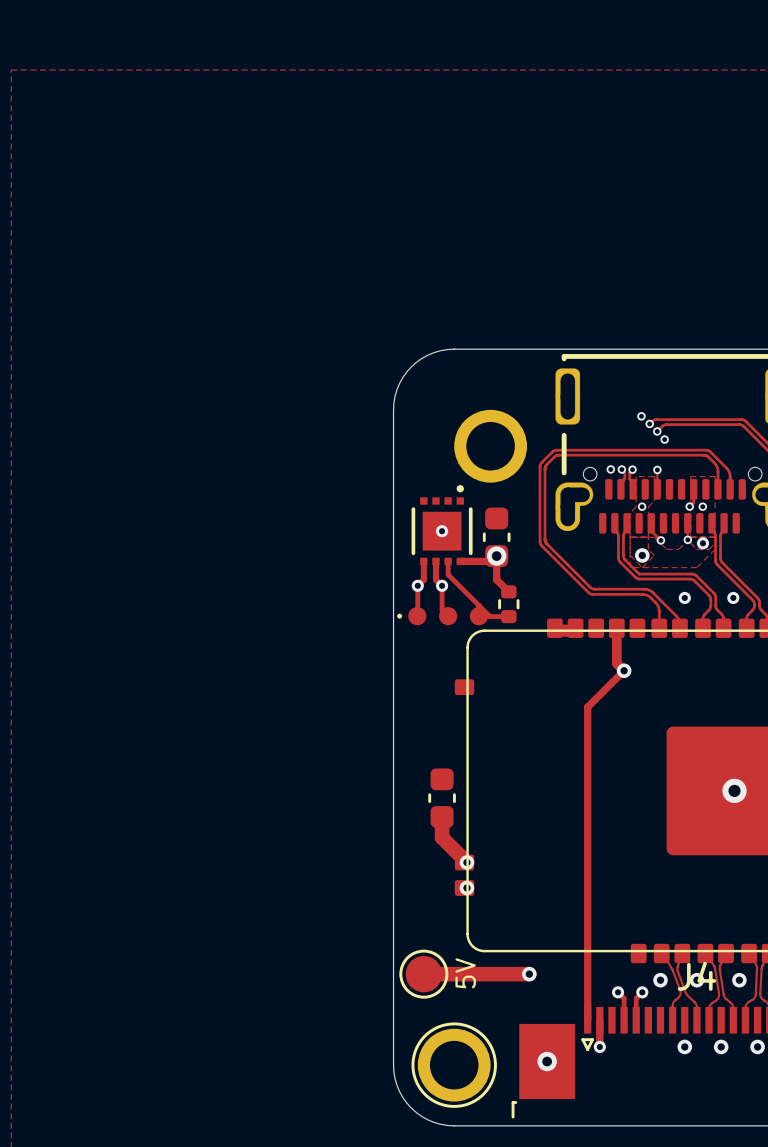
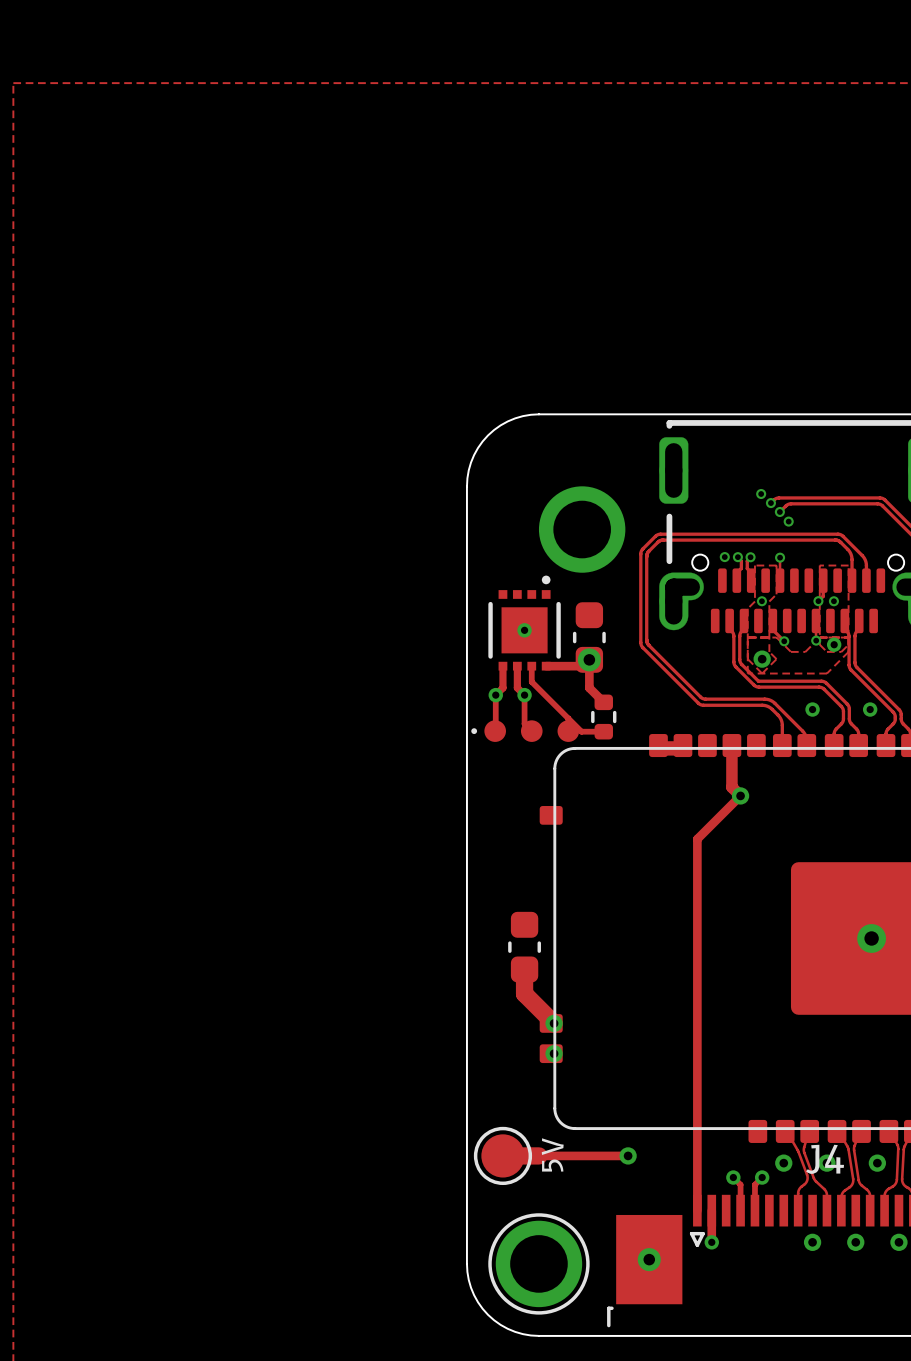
track width: thick (454, 974) (529, 974) -> thin (538, 1155) (628, 1155)

